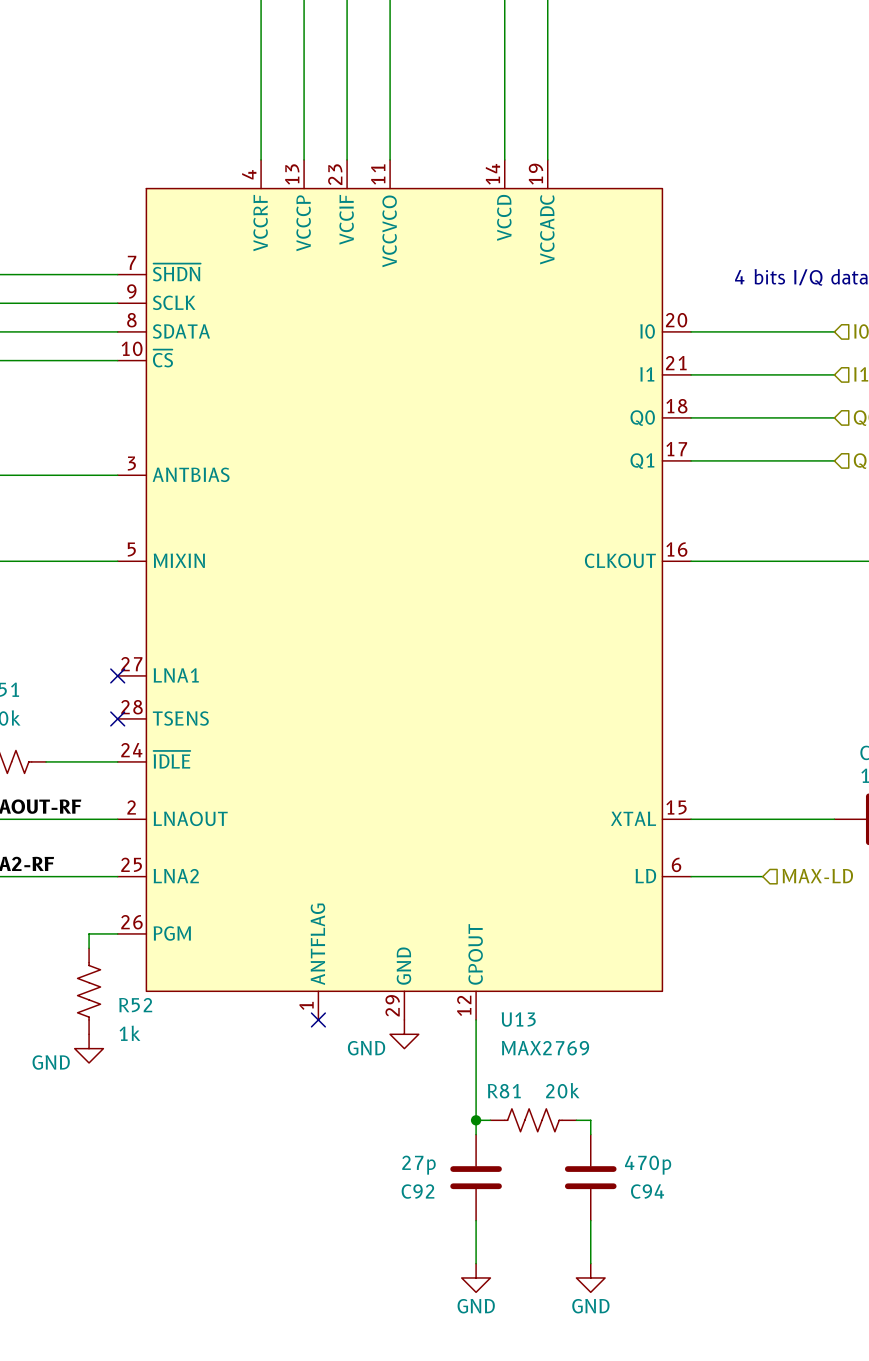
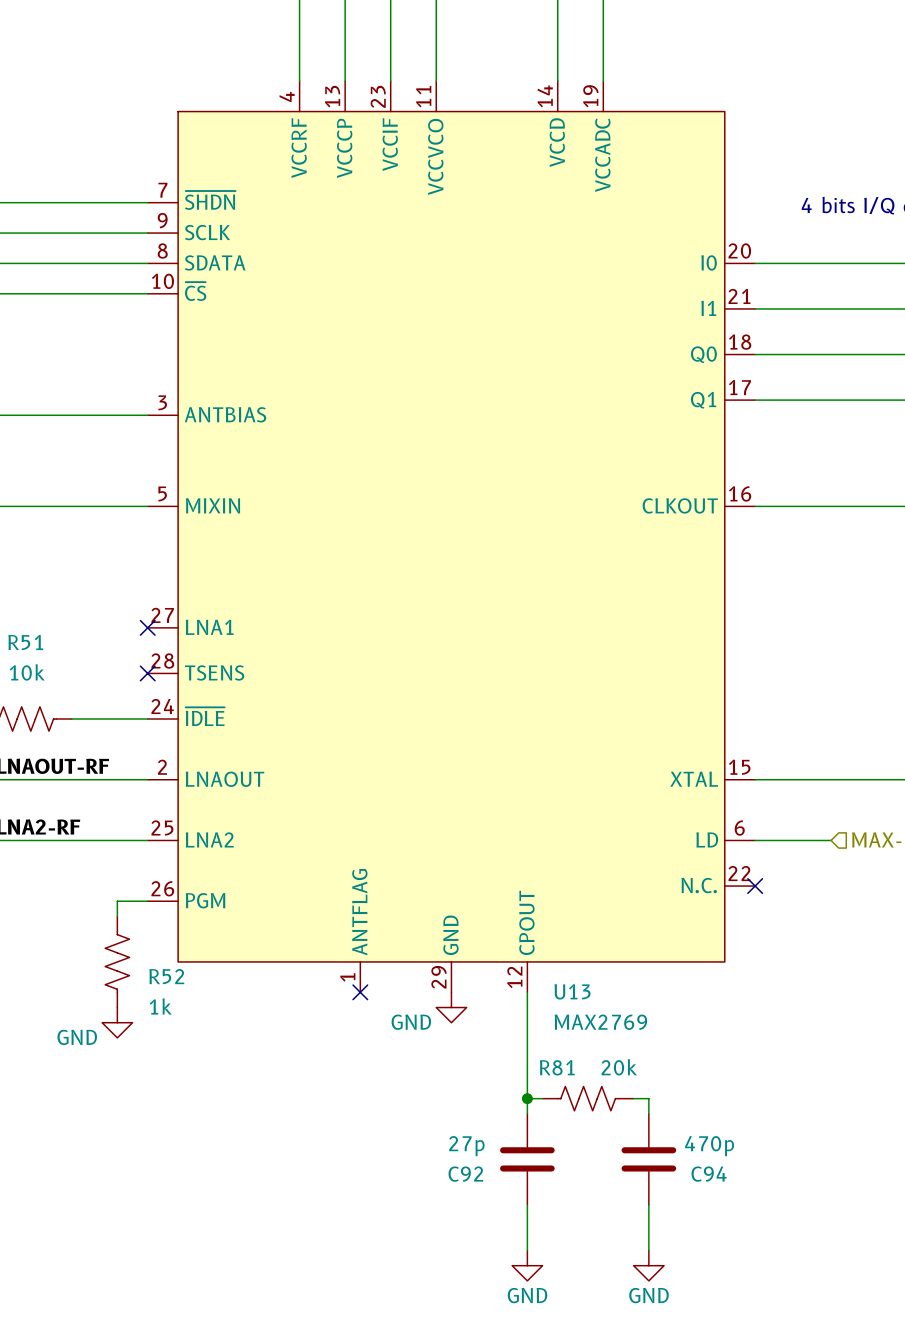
U13 symbol: [117, 159, 692, 1020] -> [147, 81, 756, 993]
no-connect mark: none -> (755, 886)

